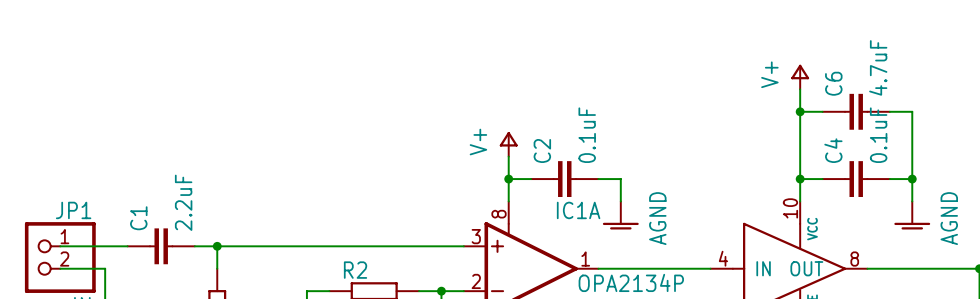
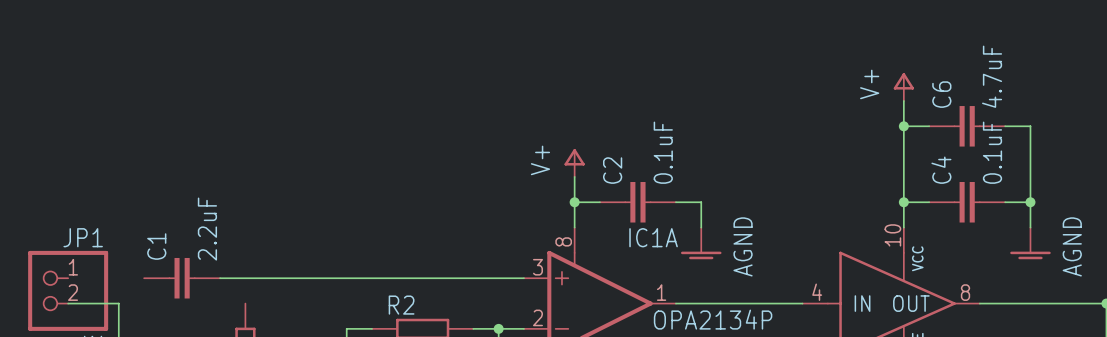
wire: (60, 246) (127, 246) -> none
wire: (217, 246) (217, 268) -> none
junction: (217, 246) -> none

